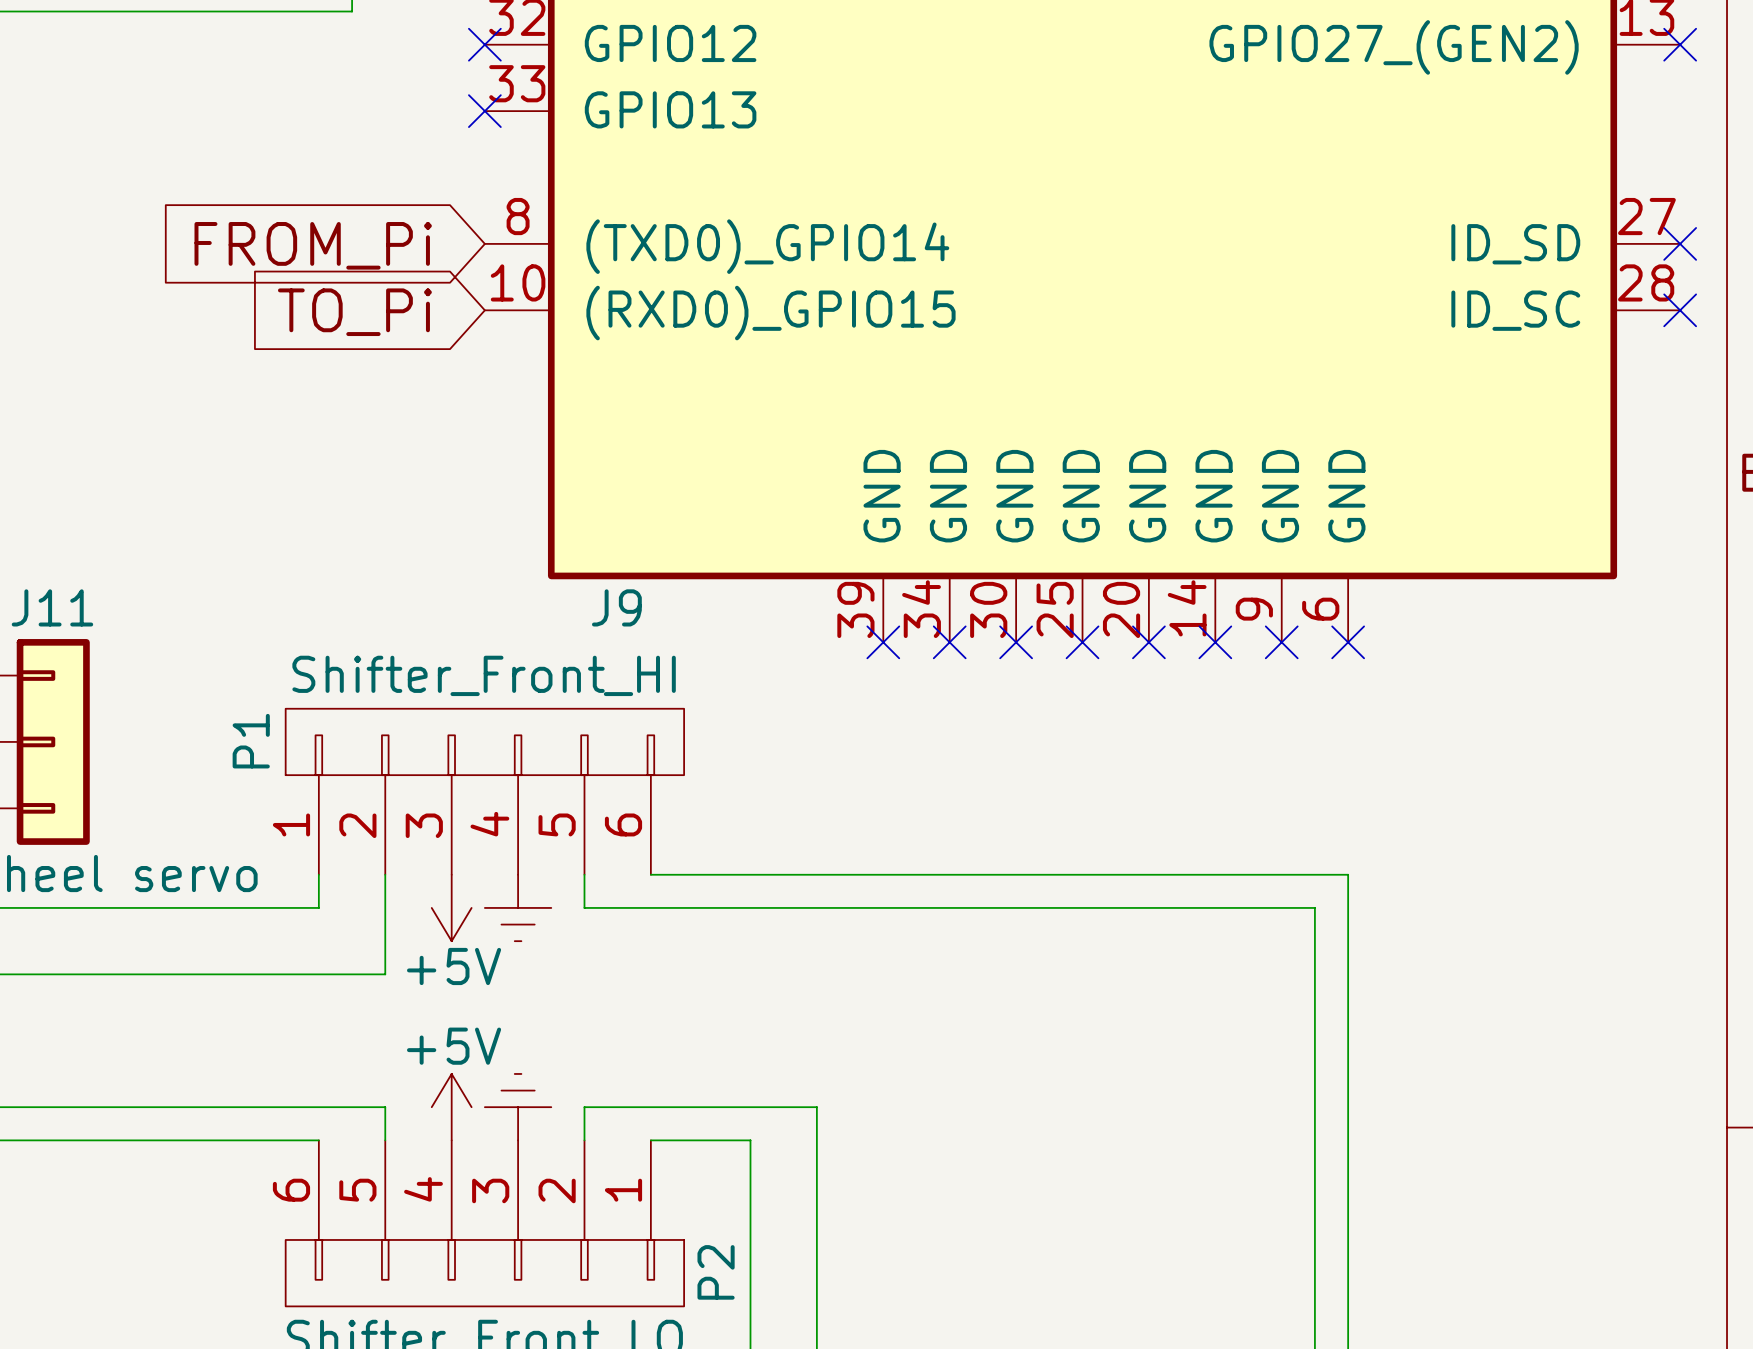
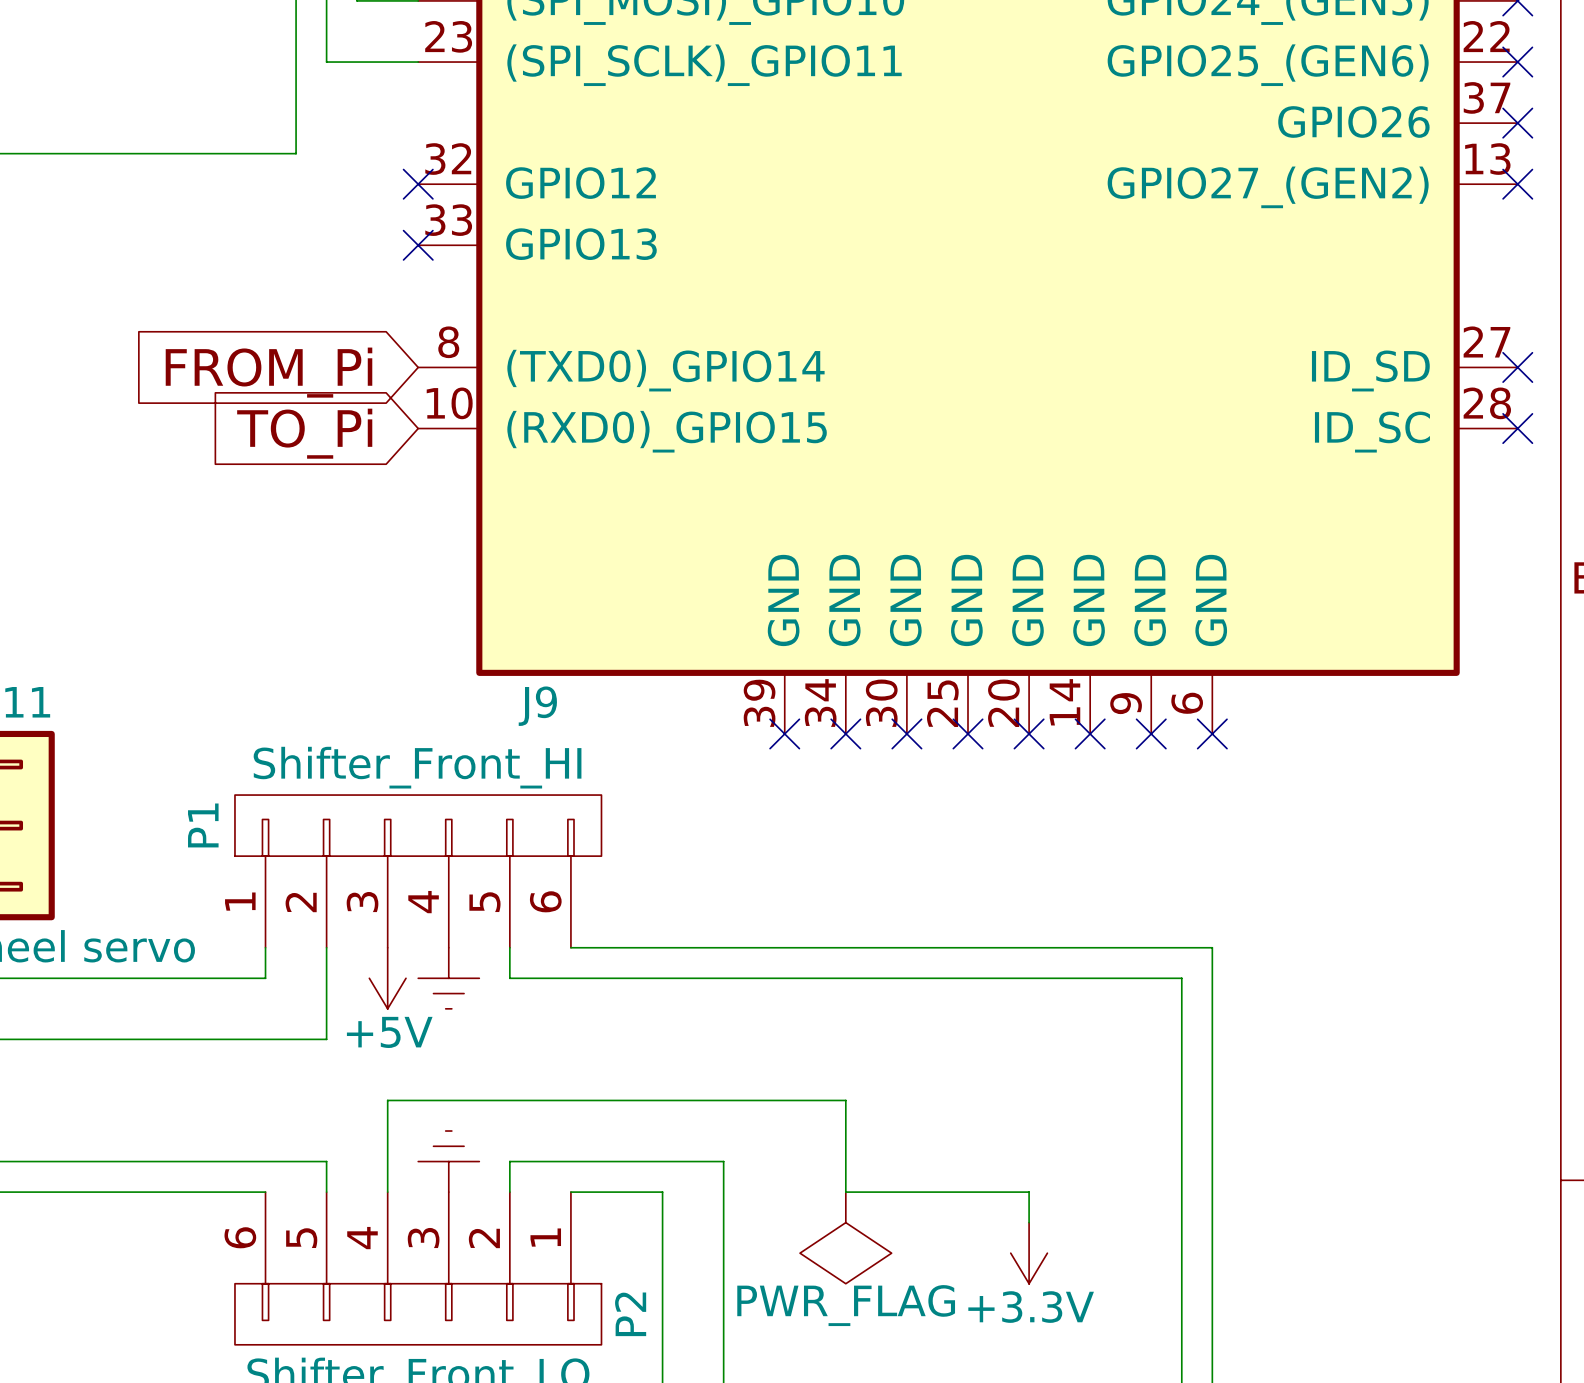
power symbol: +5V (451, 1107) -> none
wire: none -> (387, 1192) (387, 1100) (845, 1100) (845, 1192) (1029, 1192) (1029, 1222)
power symbol: none -> PWR_FLAG (845, 1237)
power symbol: none -> +3.3V (1029, 1253)

